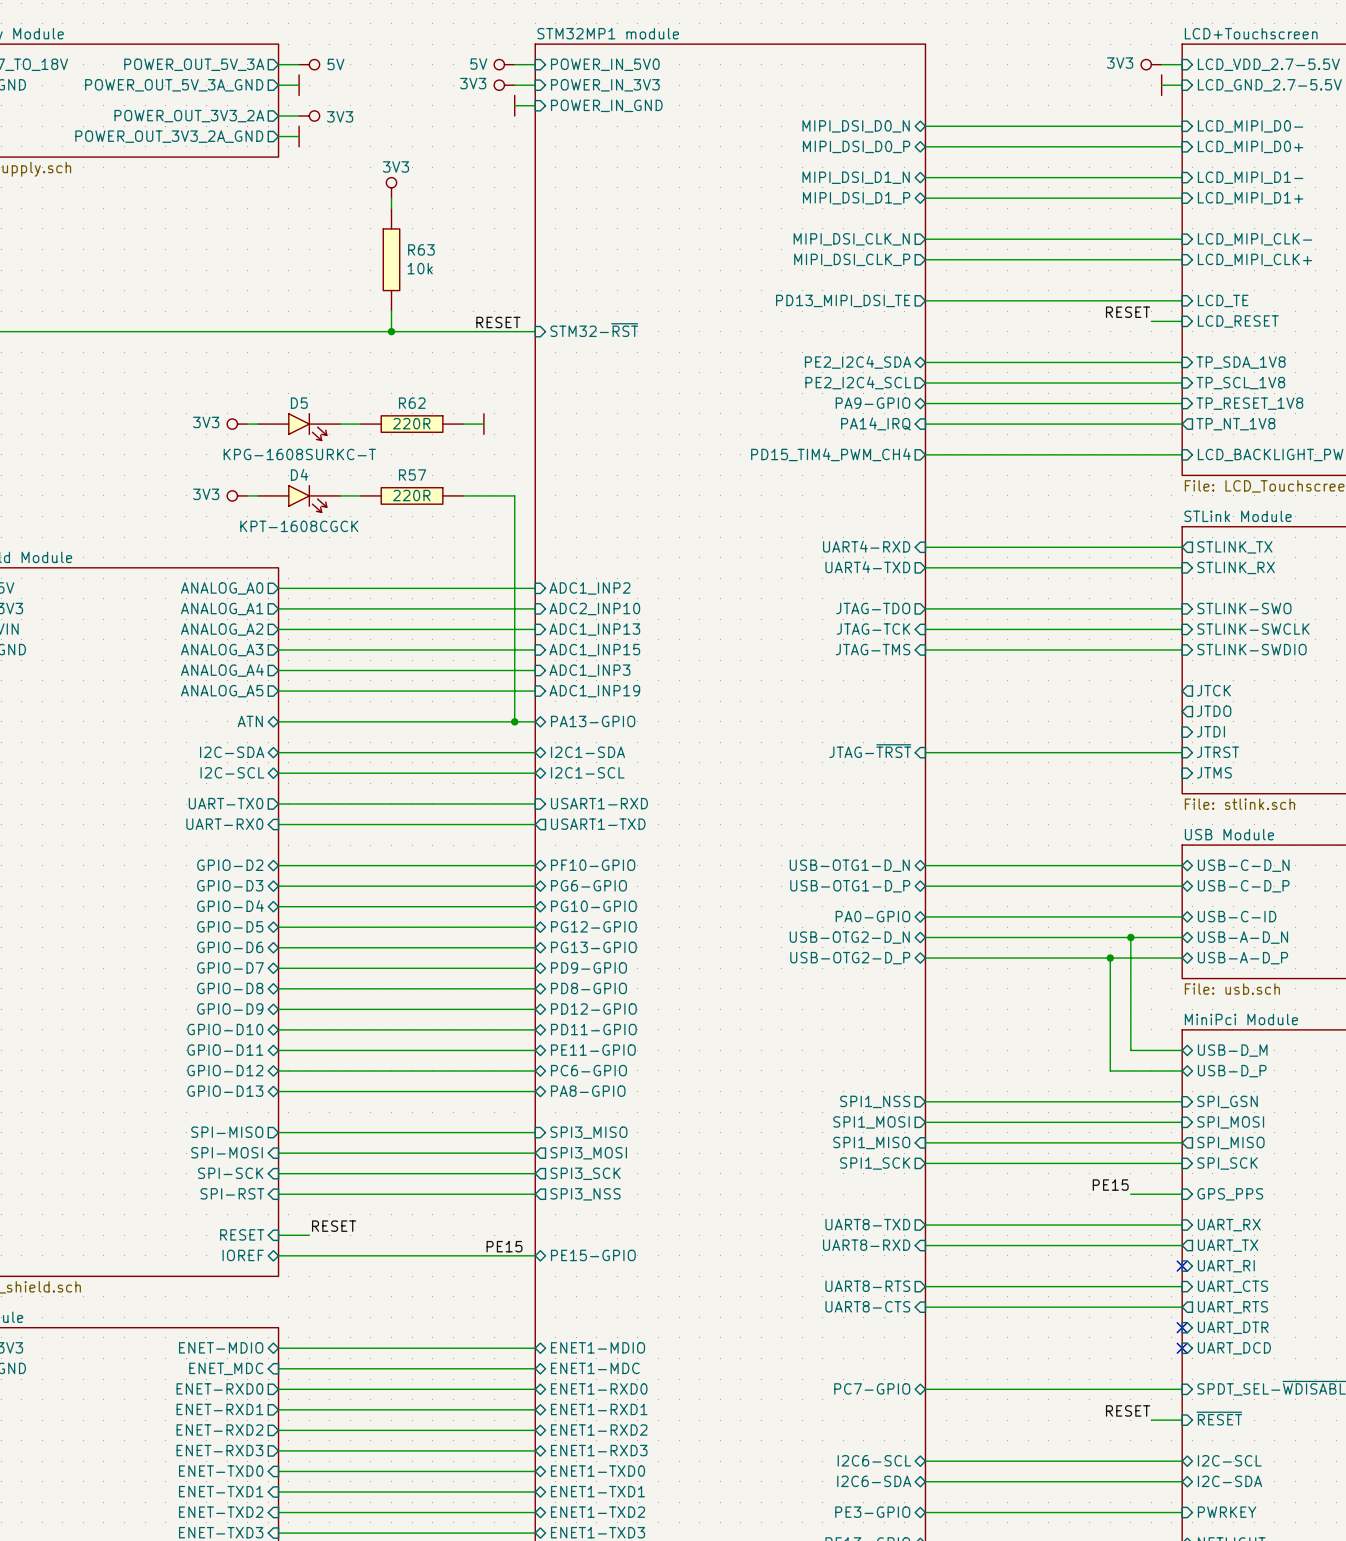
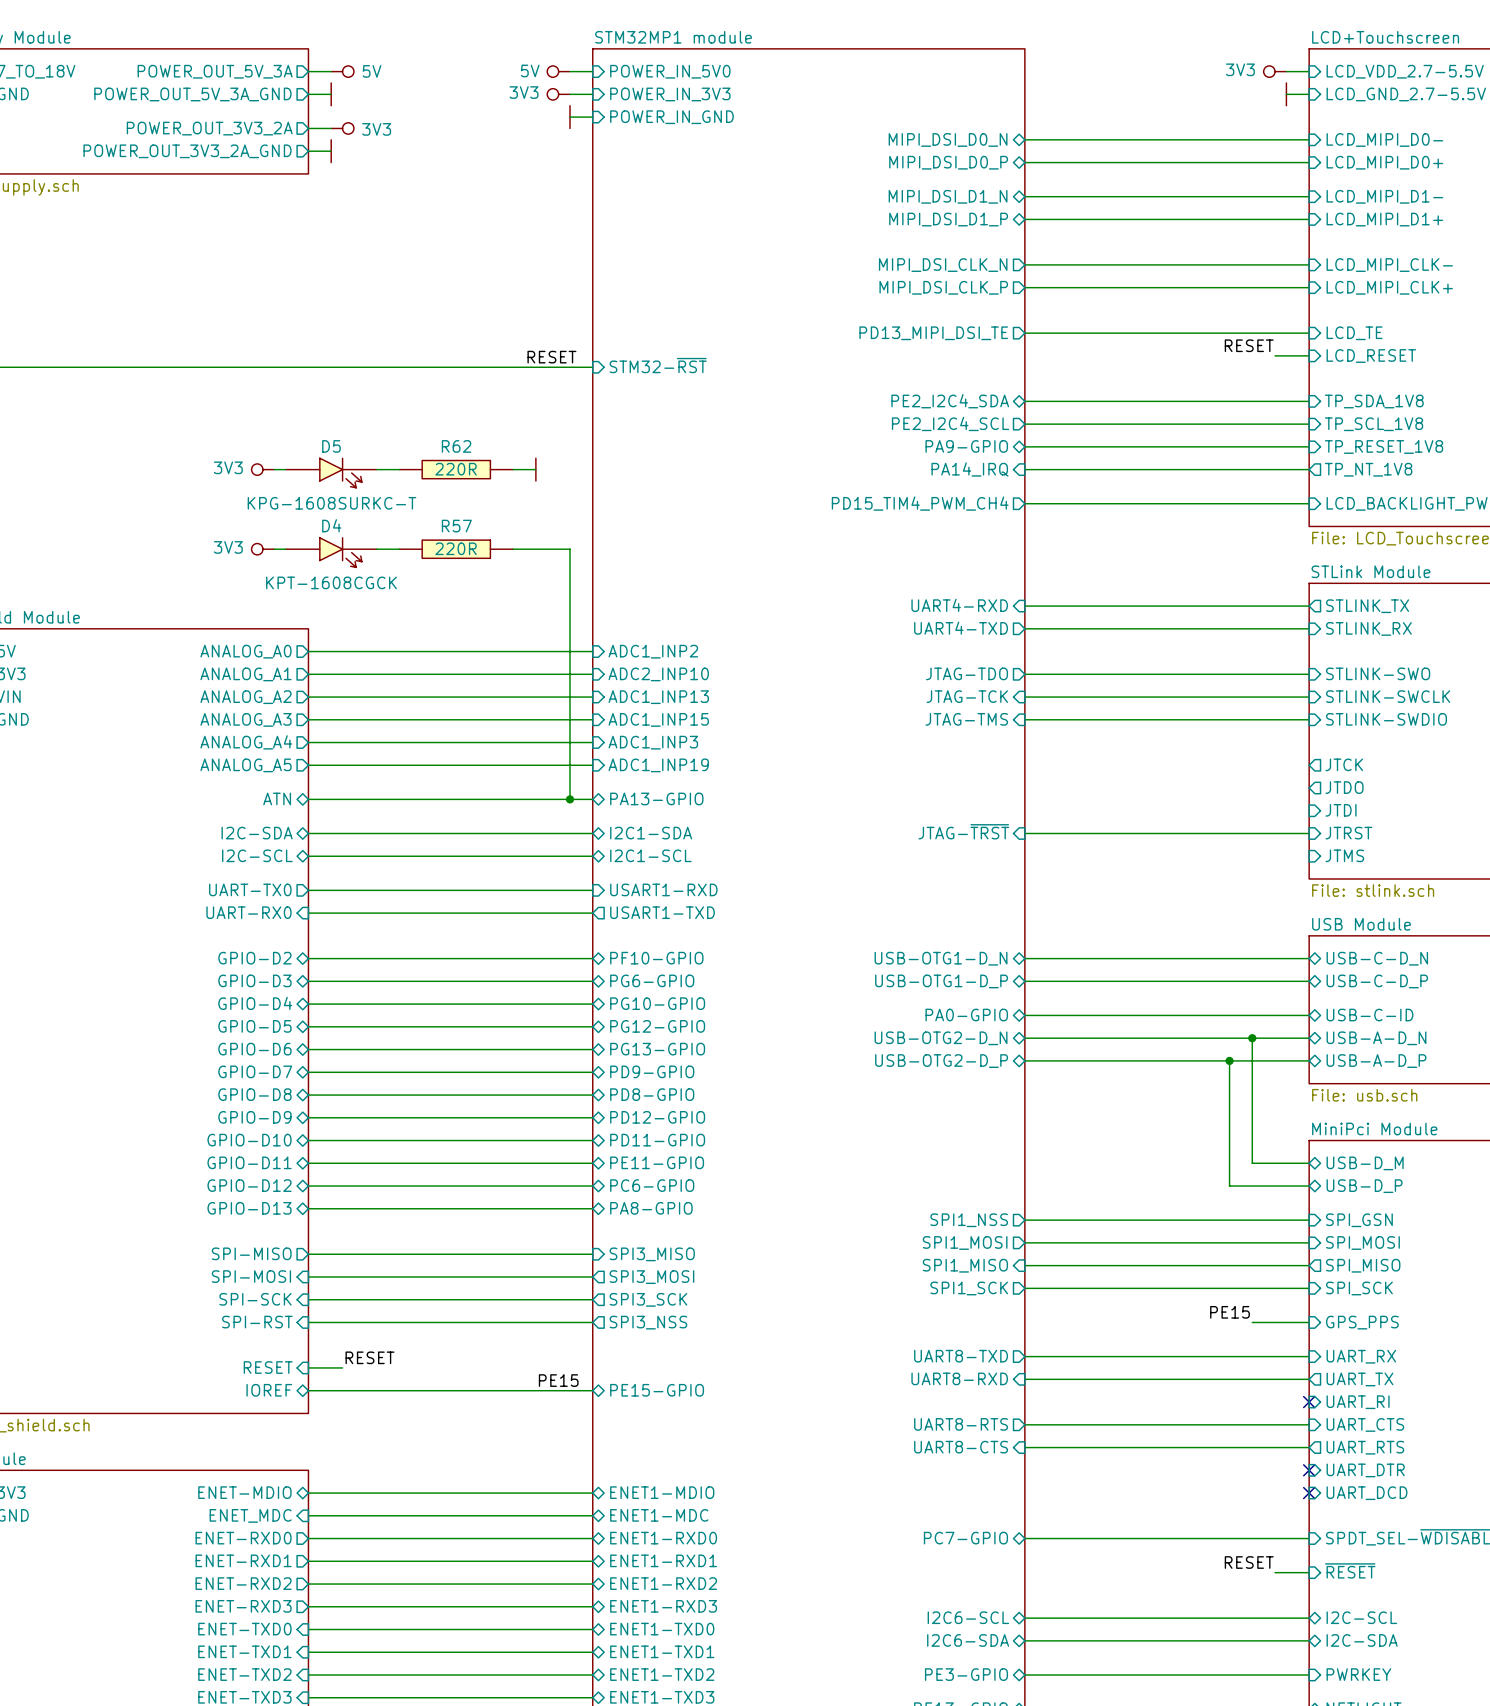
power symbol: 3V3 (391, 187) -> none
wire: (391, 198) (391, 208) -> none
R63: 10k (391, 259) -> none
wire: (391, 311) (391, 331) -> none
junction: (391, 331) -> none

